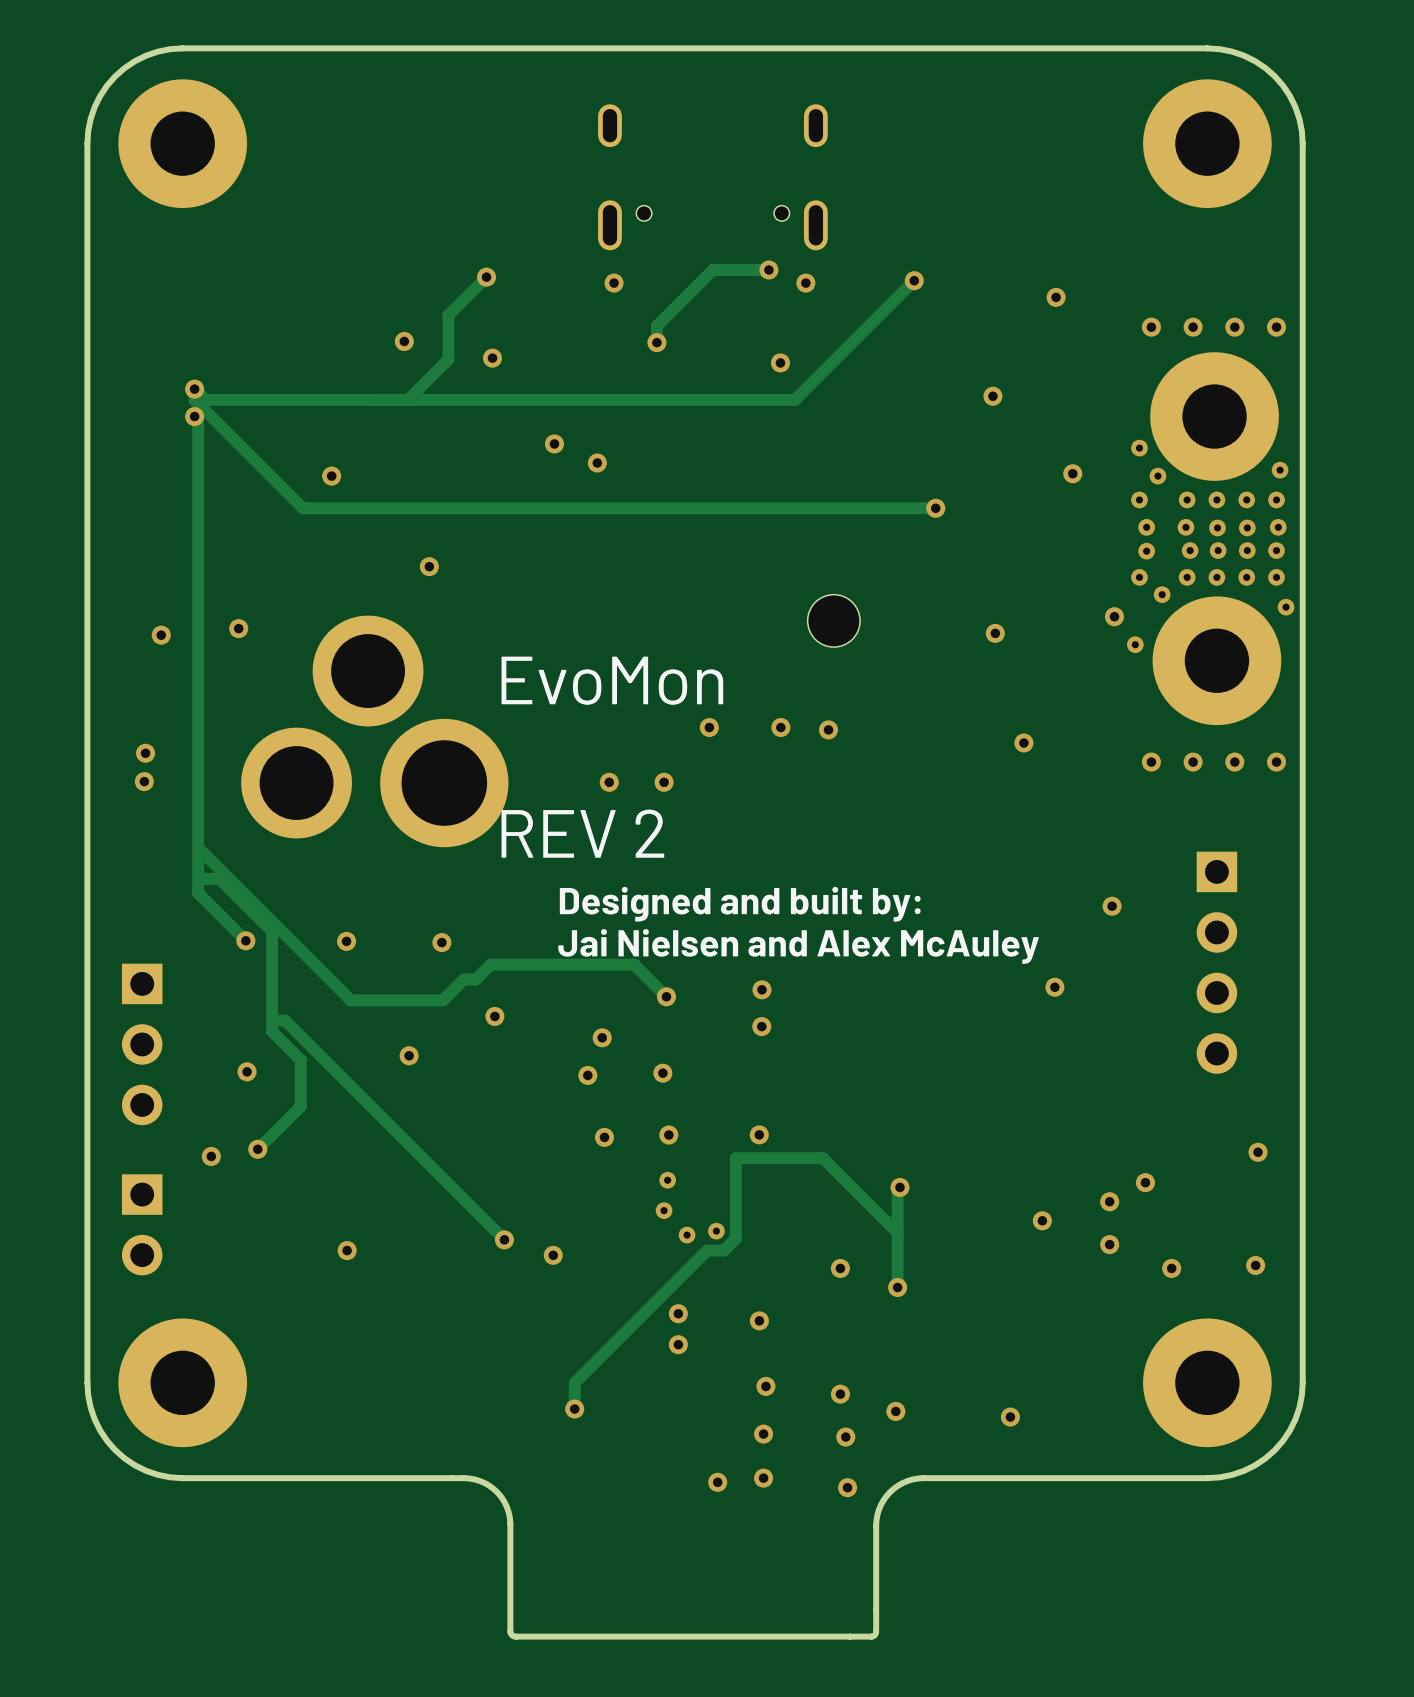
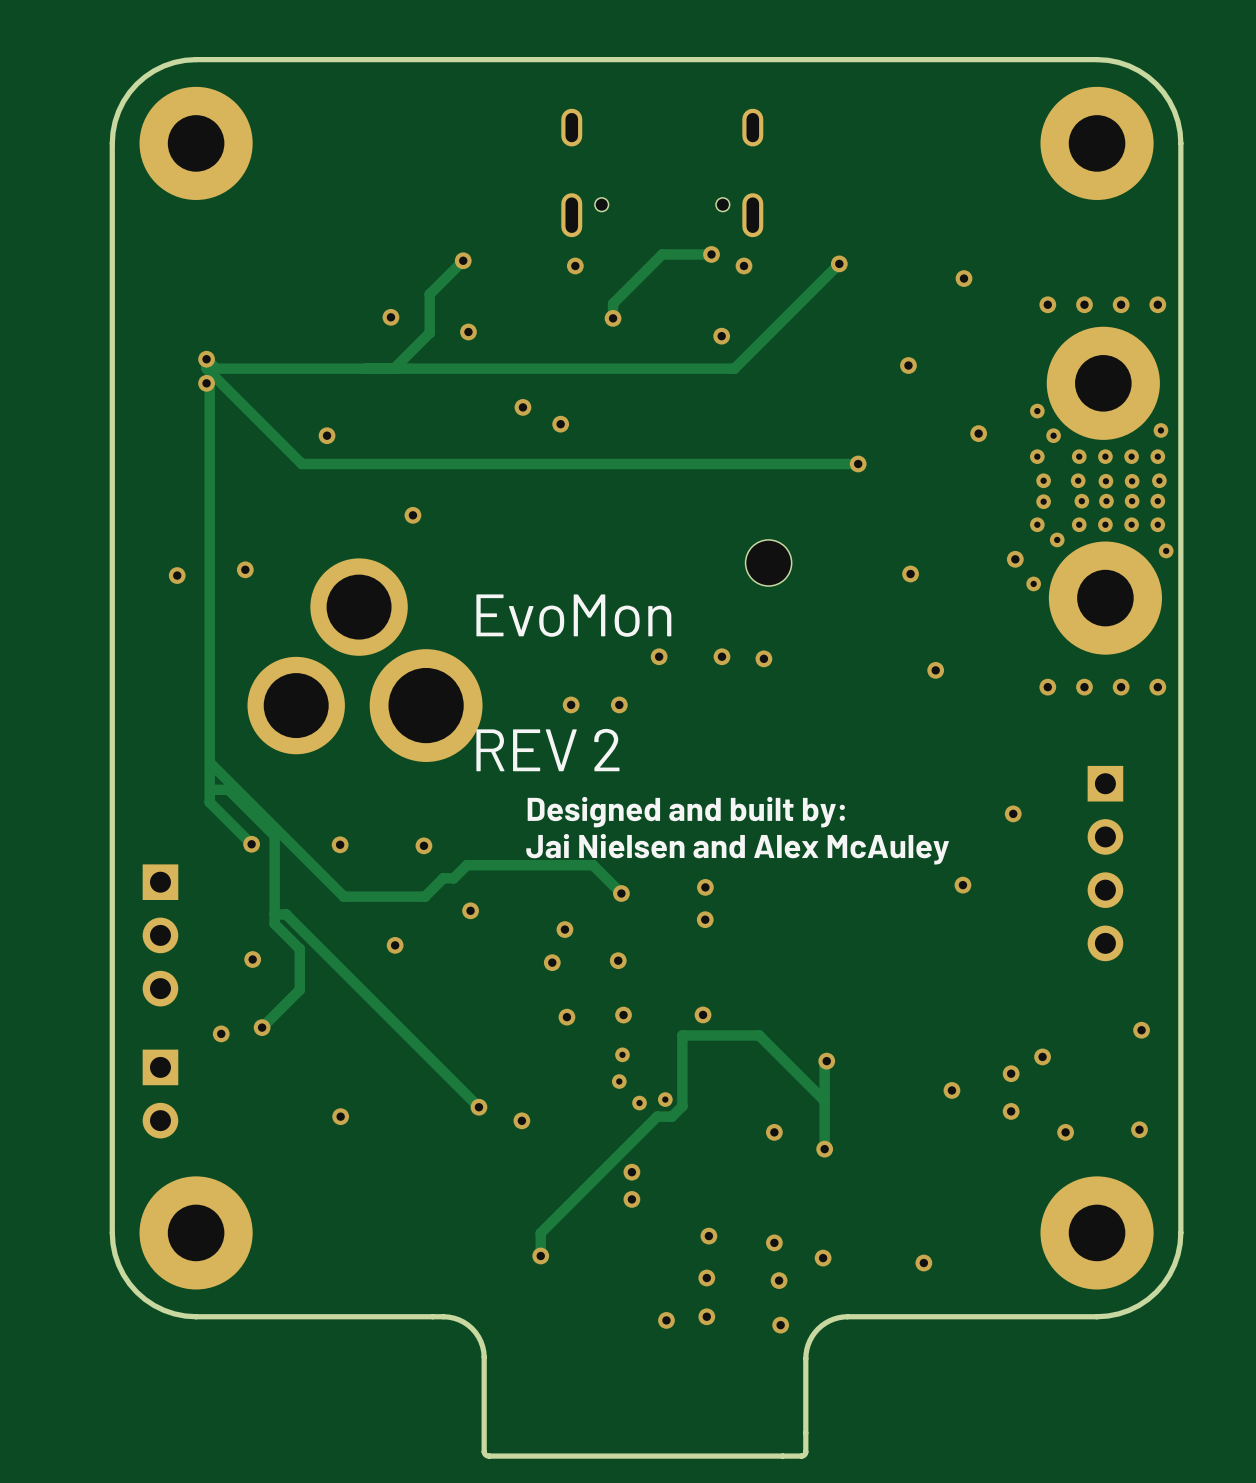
via: (145, 753) -> none
via: (144, 781) -> none
via: (759, 1320) -> none

